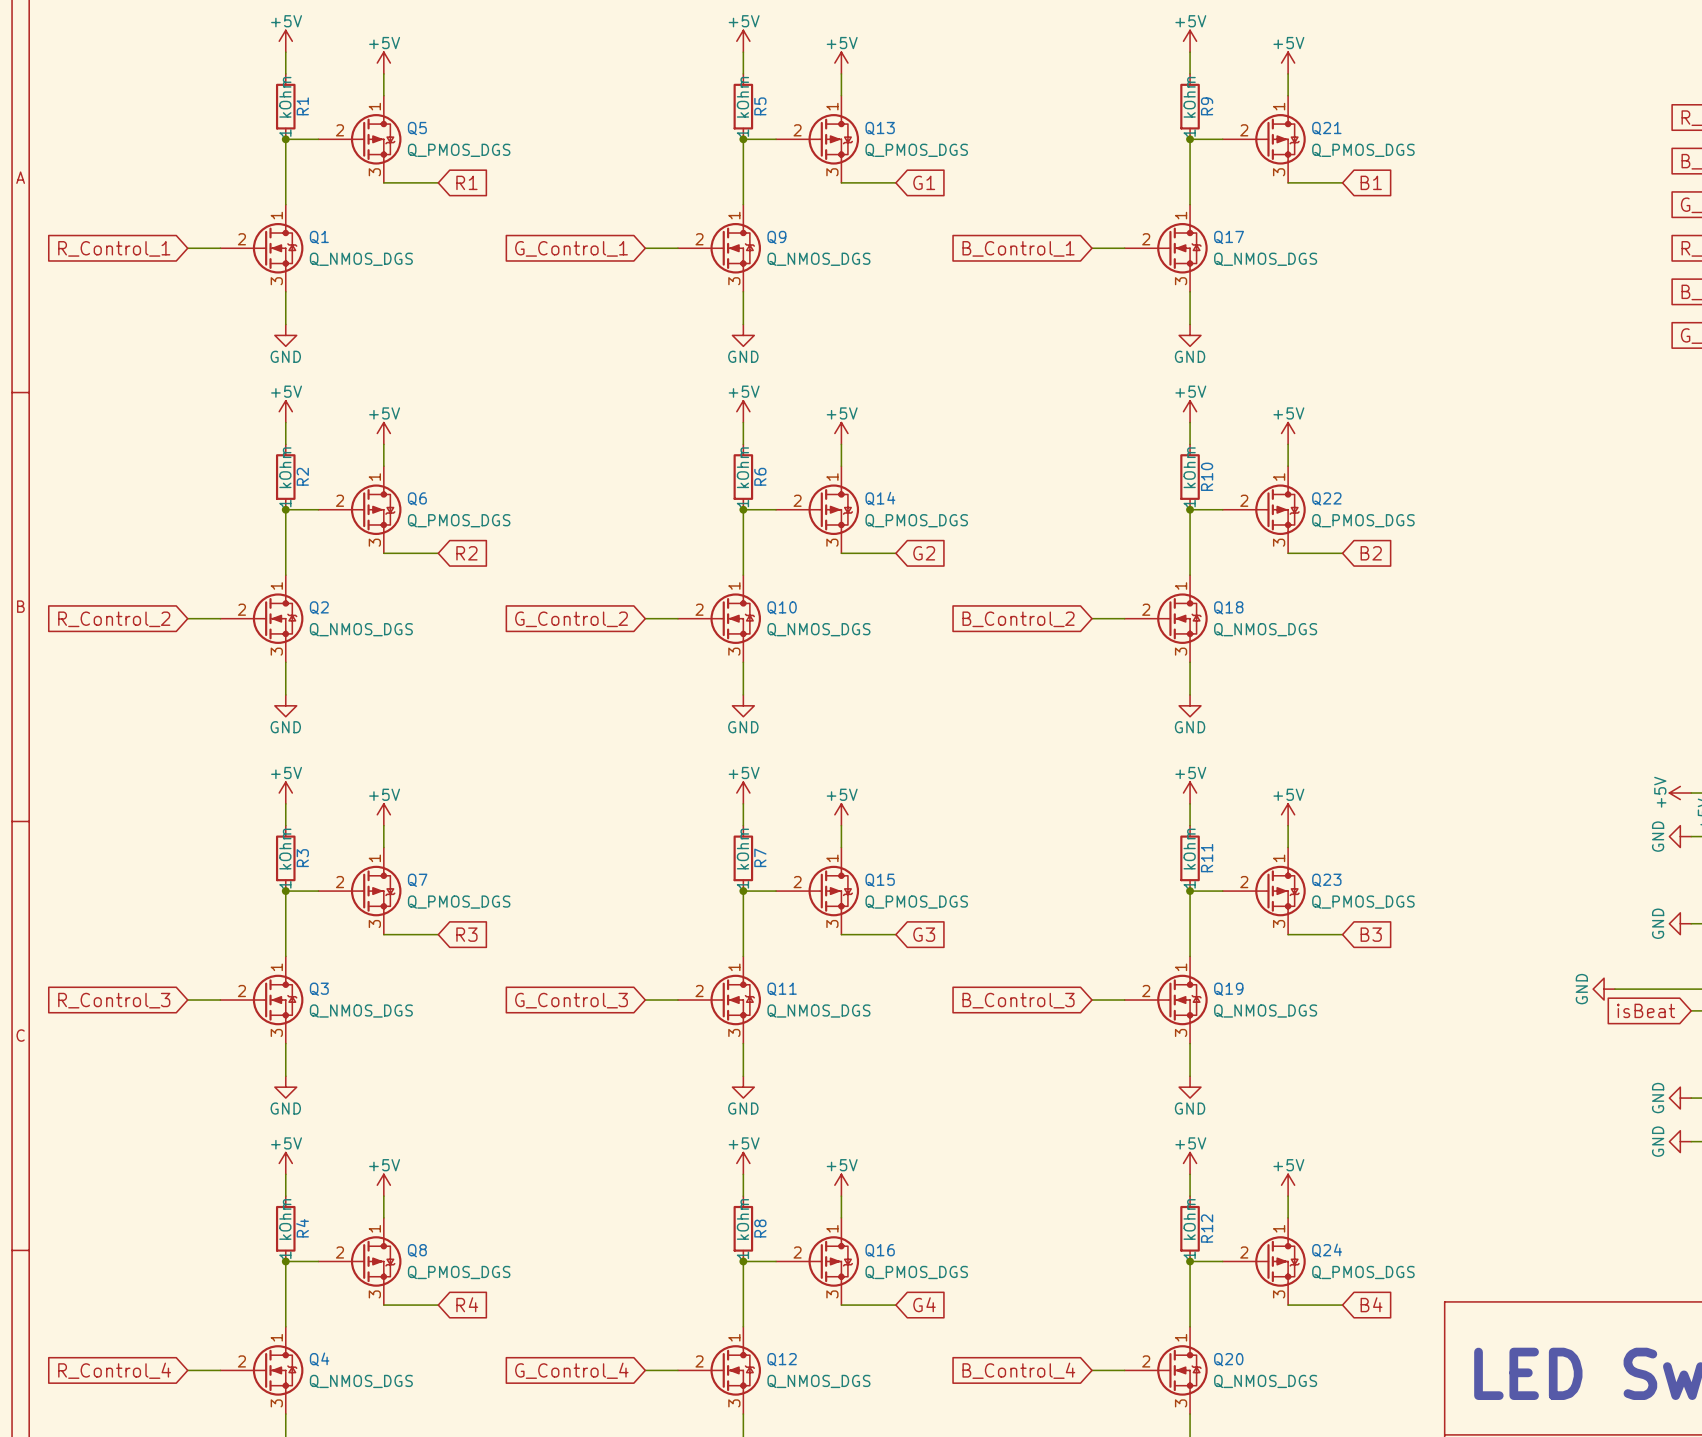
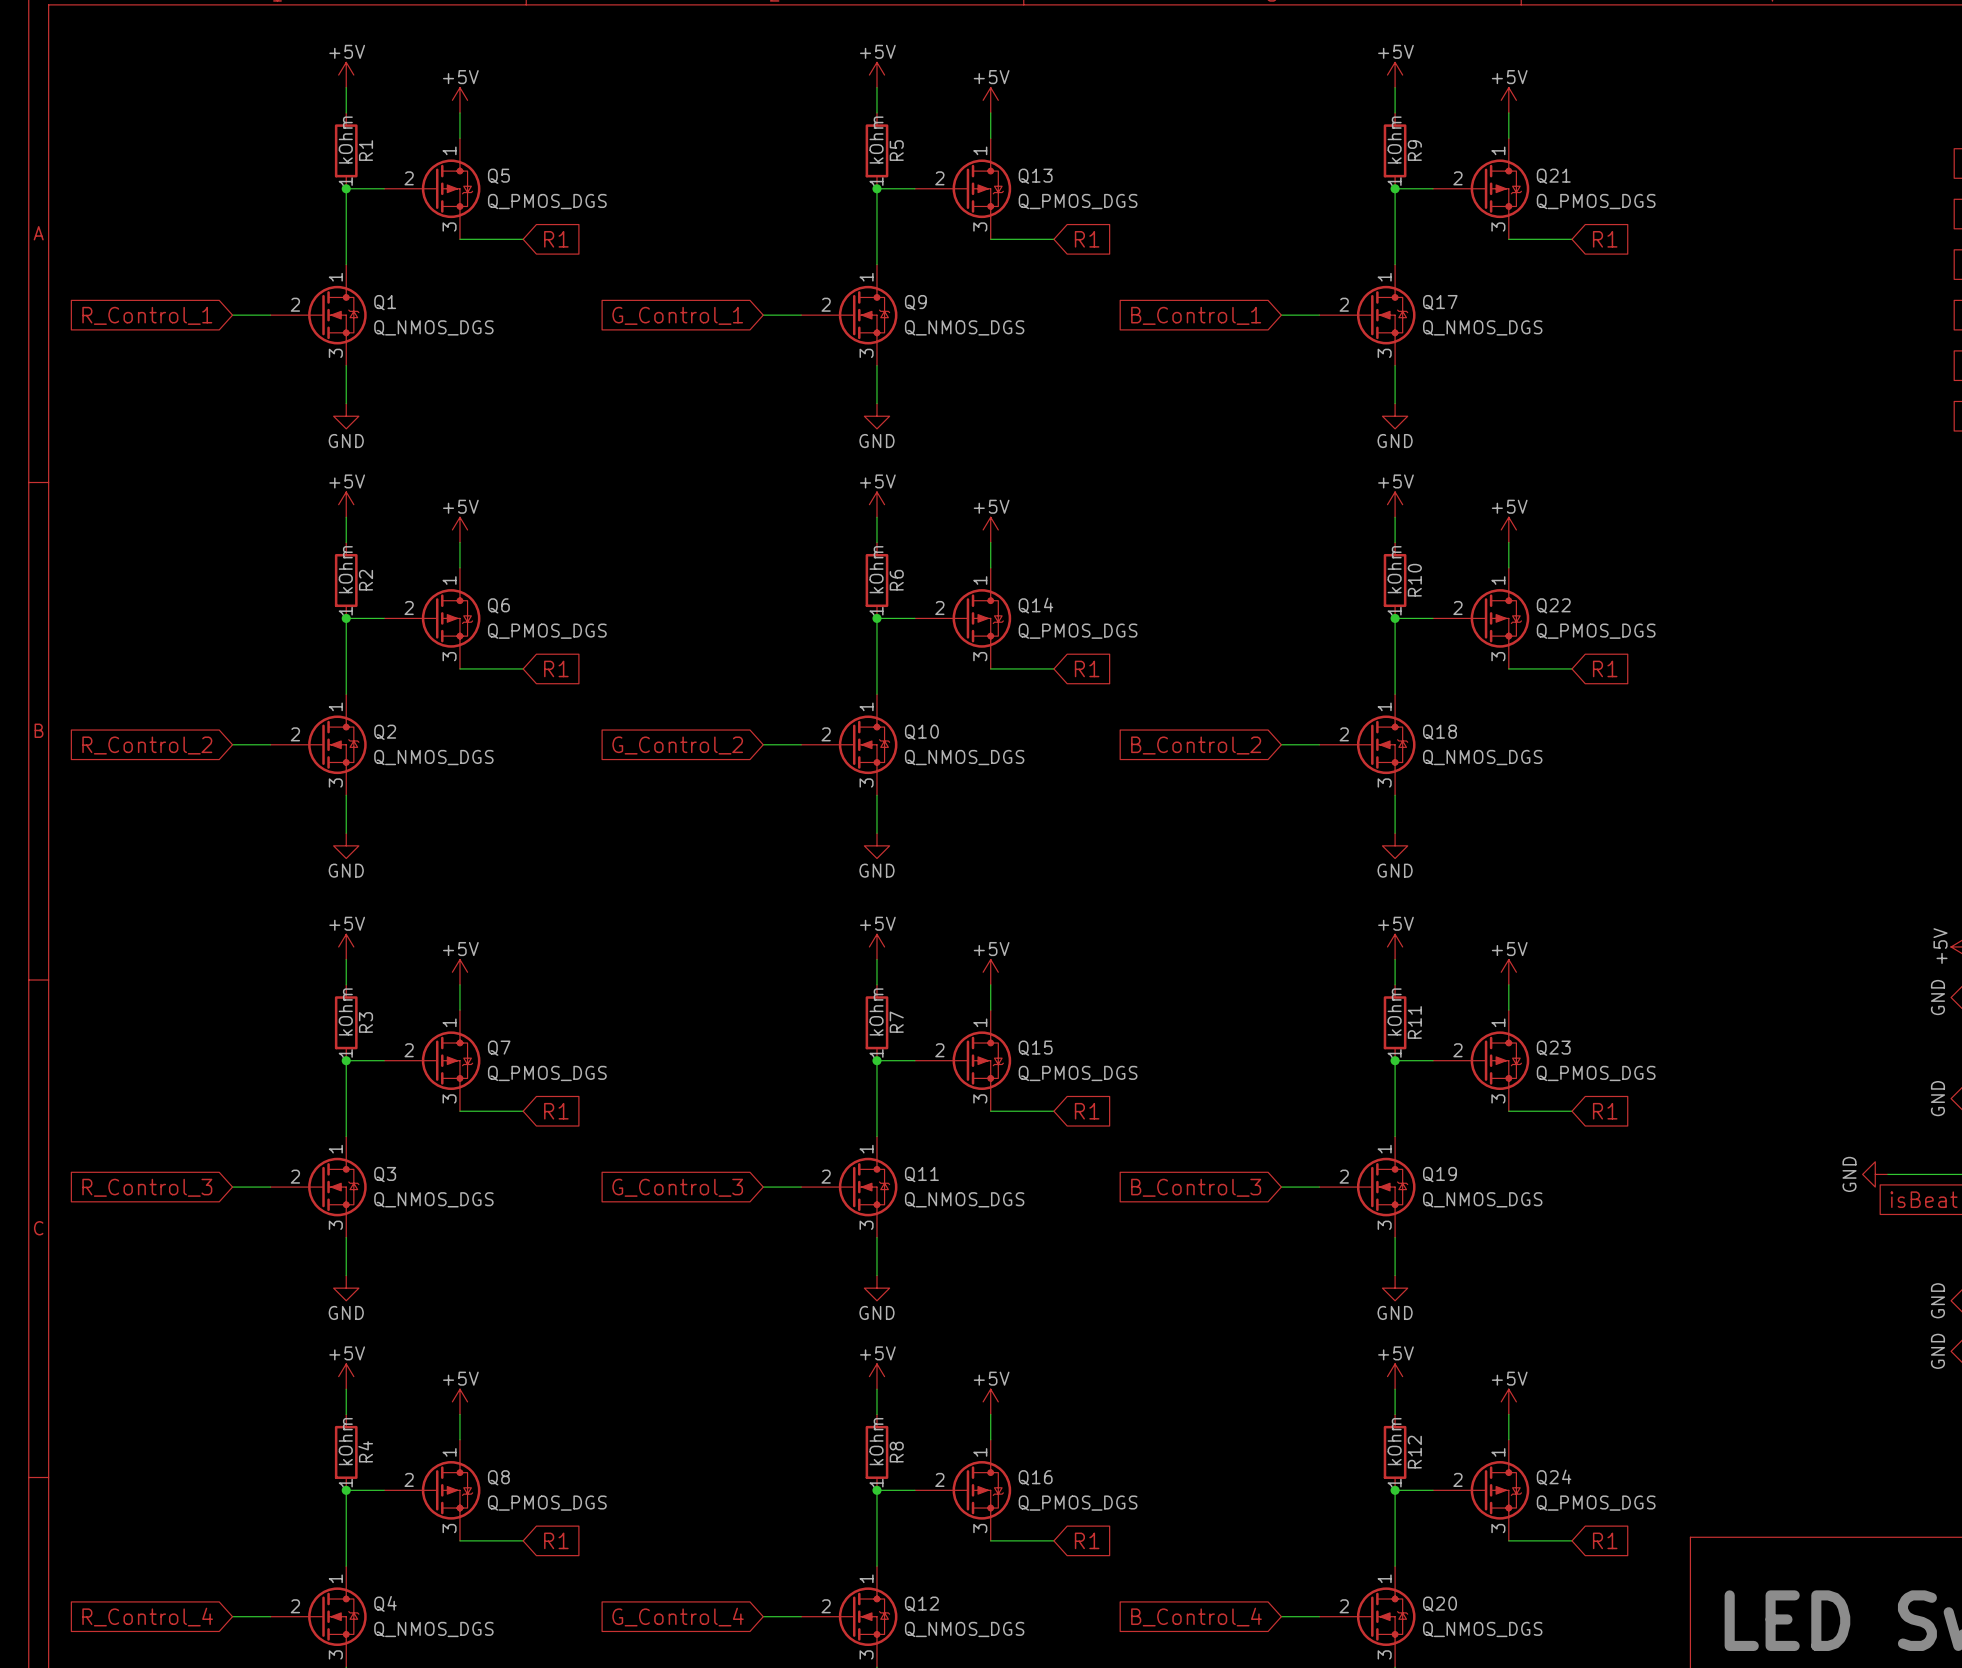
global label: G1 (924, 182) -> R1 (1087, 239)
global label: B1 (1371, 182) -> R1 (1605, 239)
global label: R2 (466, 553) -> R1 (556, 668)
global label: G2 (924, 553) -> R1 (1087, 668)
global label: B2 (1371, 553) -> R1 (1605, 668)
global label: R3 (466, 934) -> R1 (556, 1111)
global label: G3 (924, 934) -> R1 (1087, 1111)
global label: B3 (1371, 934) -> R1 (1605, 1111)
global label: R4 (467, 1304) -> R1 (556, 1540)
global label: G4 (924, 1304) -> R1 (1087, 1540)
global label: B4 (1371, 1304) -> R1 (1605, 1540)

